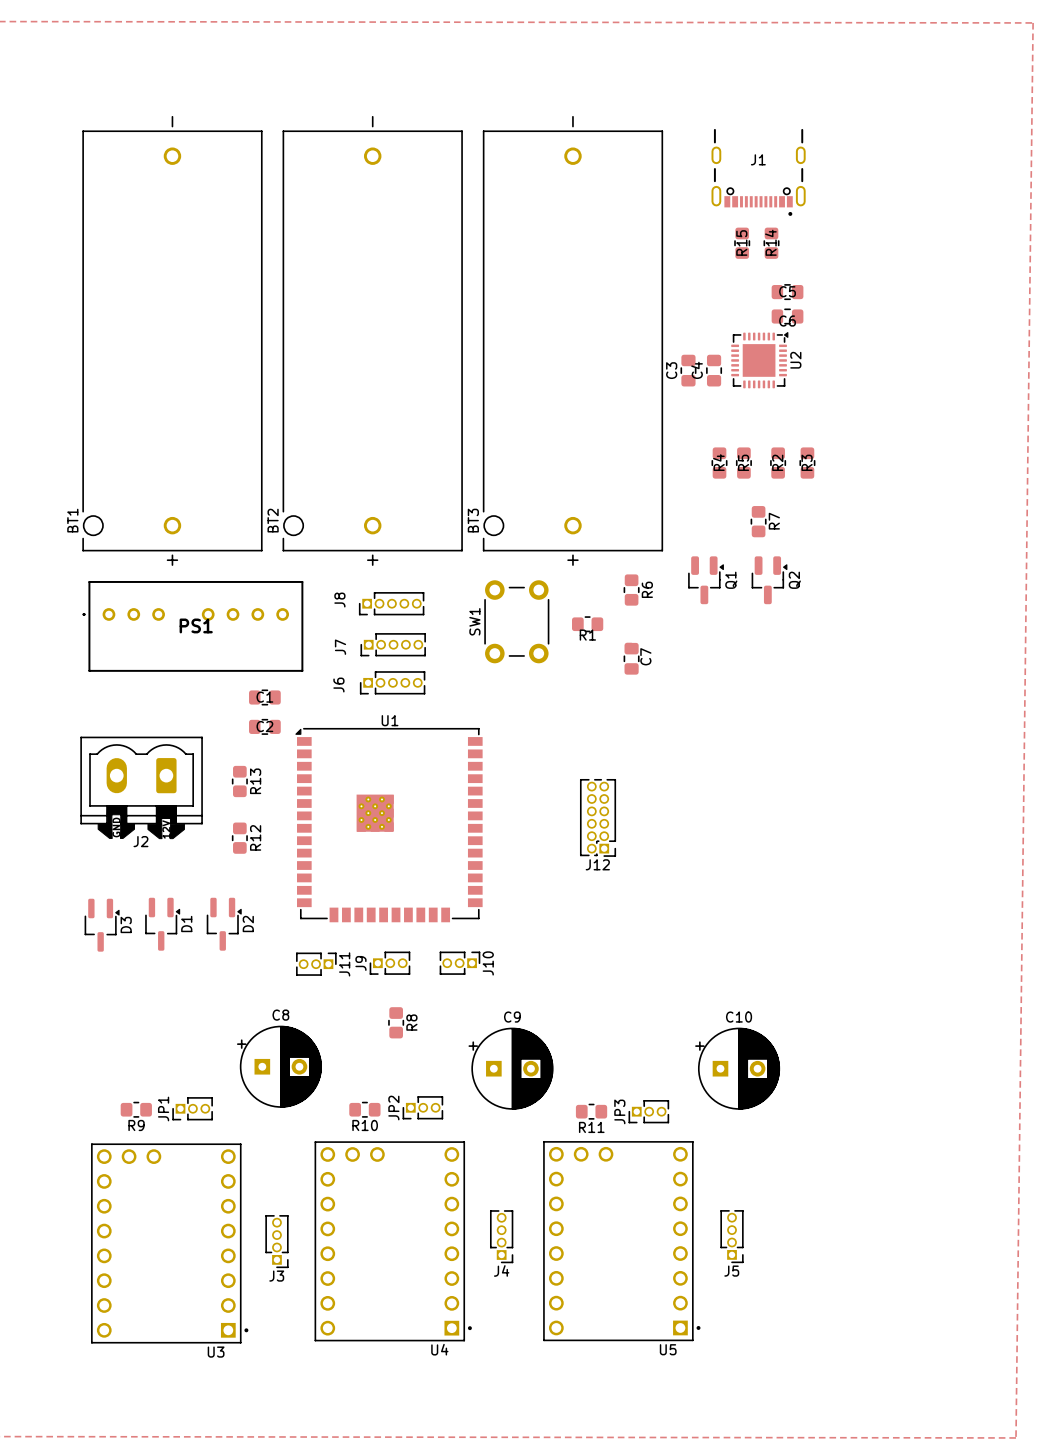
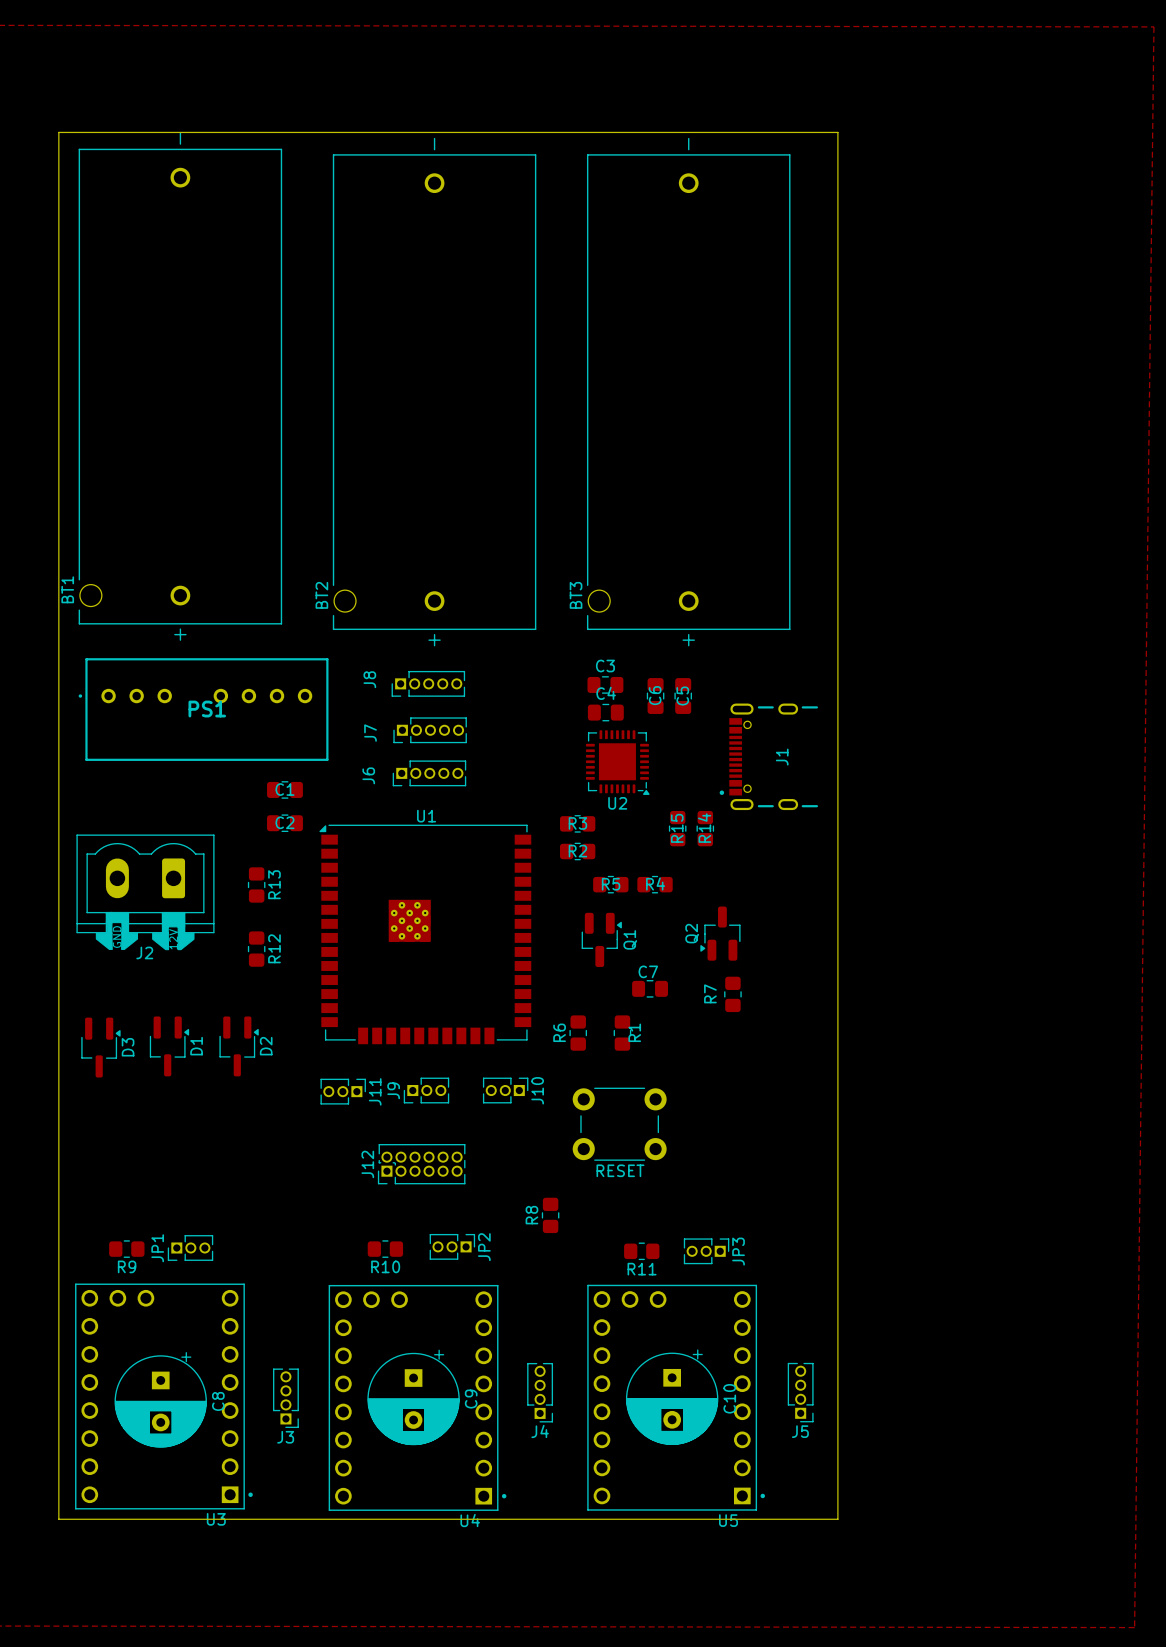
board edge: none -> (58, 132) (837, 132) (837, 1519) (58, 1519) (58, 132)
J1 rotation: 0° (758, 172) -> 90° clockwise (768, 756)
J1 position: (758, 172) -> (768, 756)
R15 position: (742, 243) -> (677, 828)
R14 position: (771, 243) -> (705, 828)
C5 rotation: 0° (787, 292) -> 90° clockwise (683, 696)
C5 position: (787, 292) -> (683, 696)
C6 rotation: 0° (787, 316) -> 90° clockwise (655, 696)
C6 position: (787, 316) -> (655, 696)
BT2 position: (372, 340) -> (434, 392)
BT3 position: (572, 340) -> (688, 392)
U2 rotation: 0° (759, 360) -> 90° clockwise (617, 762)
U2 position: (759, 360) -> (617, 762)
C3 rotation: 0° (688, 370) -> 90° clockwise (605, 684)
C3 position: (688, 370) -> (605, 684)
C4 rotation: 0° (714, 370) -> 90° clockwise (605, 712)
C4 position: (714, 370) -> (605, 712)
R4 rotation: 0° (719, 463) -> 90° clockwise (655, 884)
R4 position: (719, 463) -> (655, 884)
R5 rotation: 0° (743, 463) -> 90° clockwise (610, 884)
R5 position: (743, 463) -> (610, 884)
R2 rotation: 0° (778, 463) -> 90° clockwise (577, 851)
R2 position: (778, 463) -> (577, 851)
R3 rotation: 0° (807, 463) -> 90° clockwise (577, 823)
R3 position: (807, 463) -> (577, 823)
R7 position: (758, 521) -> (732, 994)
R7 name position: R7 (774, 521) -> R7 (710, 993)
Q1 position: (706, 580) -> (601, 939)
Q2 rotation: 0° (769, 580) -> 180° (720, 933)
Q2 position: (769, 580) -> (720, 933)
R6 name position: R6 (647, 589) -> R6 (559, 1032)
R6 position: (631, 590) -> (578, 1033)
SW1: (516, 621) -> none
R1 rotation: 0° (587, 624) -> 90° clockwise (622, 1033)
R1 position: (587, 624) -> (622, 1033)
C7 name position: C7 (645, 656) -> C7 (648, 971)
C7 rotation: 0° (631, 658) -> 90° clockwise (650, 988)
C7 position: (631, 658) -> (650, 988)
J12 rotation: 0° (598, 817) -> 90° clockwise (421, 1164)
J12 position: (598, 817) -> (421, 1164)
RESET: none -> (619, 1124)
R8 position: (396, 1022) -> (550, 1215)
R8 name position: R8 (411, 1022) -> R8 (531, 1215)
C8 rotation: 0° (279, 1066) -> 90° clockwise (160, 1399)
C8 position: (279, 1066) -> (160, 1399)
C9 rotation: 0° (510, 1068) -> 90° clockwise (413, 1397)
C9 position: (510, 1068) -> (413, 1397)
C10 rotation: 0° (737, 1068) -> 90° clockwise (672, 1397)
C10 position: (737, 1068) -> (672, 1397)
JP2 rotation: 0° (422, 1107) -> 180° (452, 1246)
JP1 position: (192, 1108) -> (190, 1247)
R9 position: (136, 1109) -> (126, 1249)
R10 position: (364, 1109) -> (385, 1249)
R11 position: (591, 1111) -> (641, 1251)
JP3 rotation: 0° (648, 1111) -> 180° (706, 1251)
J4 position: (501, 1236) -> (540, 1392)
J5 position: (732, 1236) -> (800, 1392)
J3 position: (276, 1241) -> (285, 1398)
U4 position: (393, 1241) -> (417, 1397)
U5 position: (621, 1241) -> (676, 1397)
U3 position: (169, 1243) -> (163, 1396)

